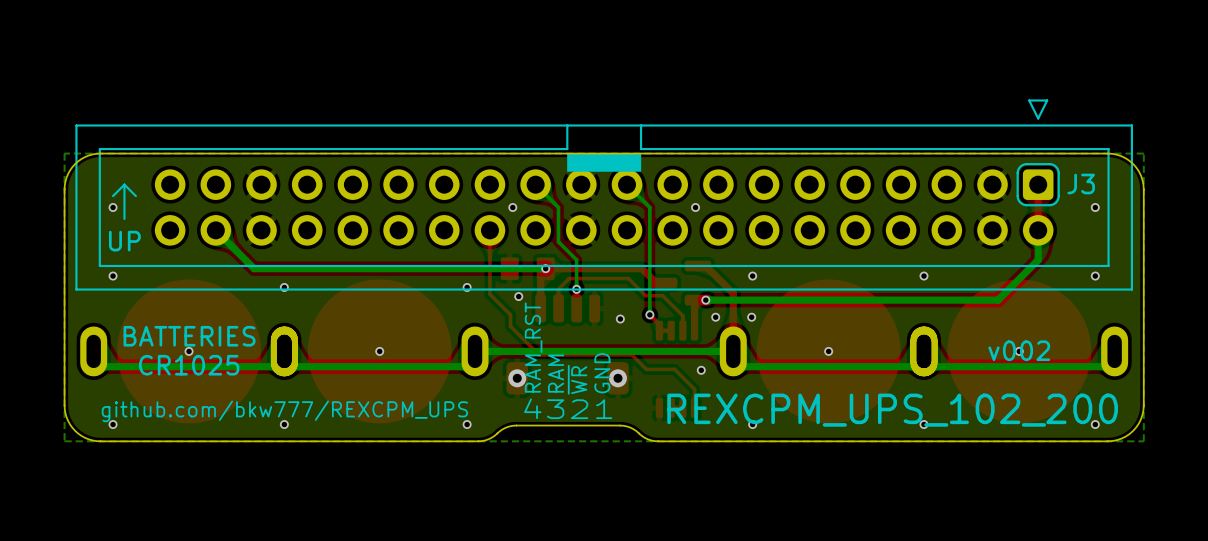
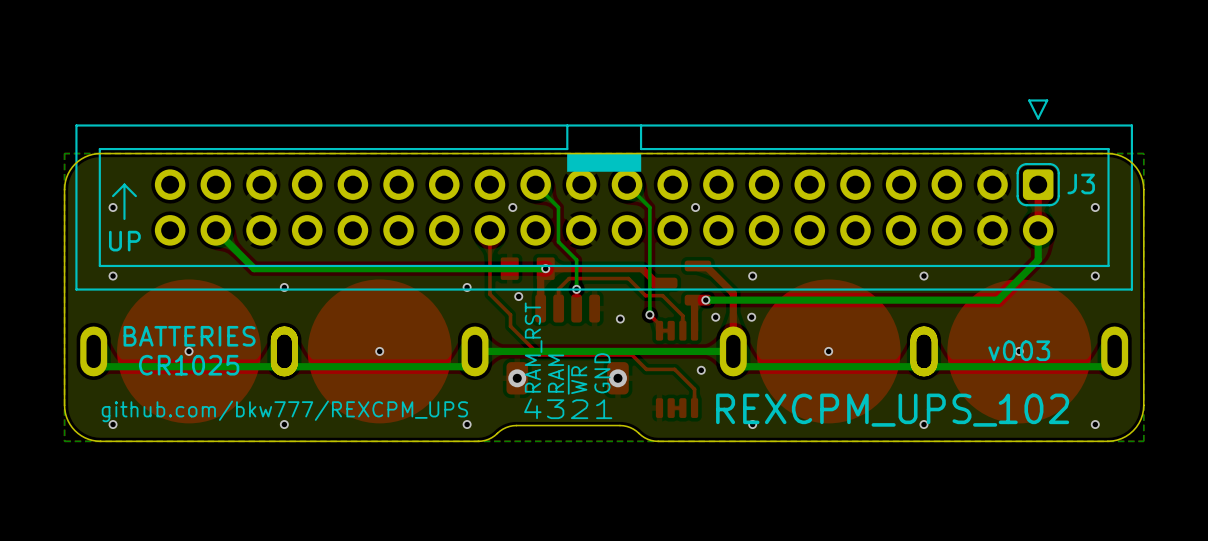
text: v002 (1019, 350) -> v003 (1019, 350)
text: REXCPM_UPS_102_200 (892, 410) -> REXCPM_UPS_102 (892, 410)

